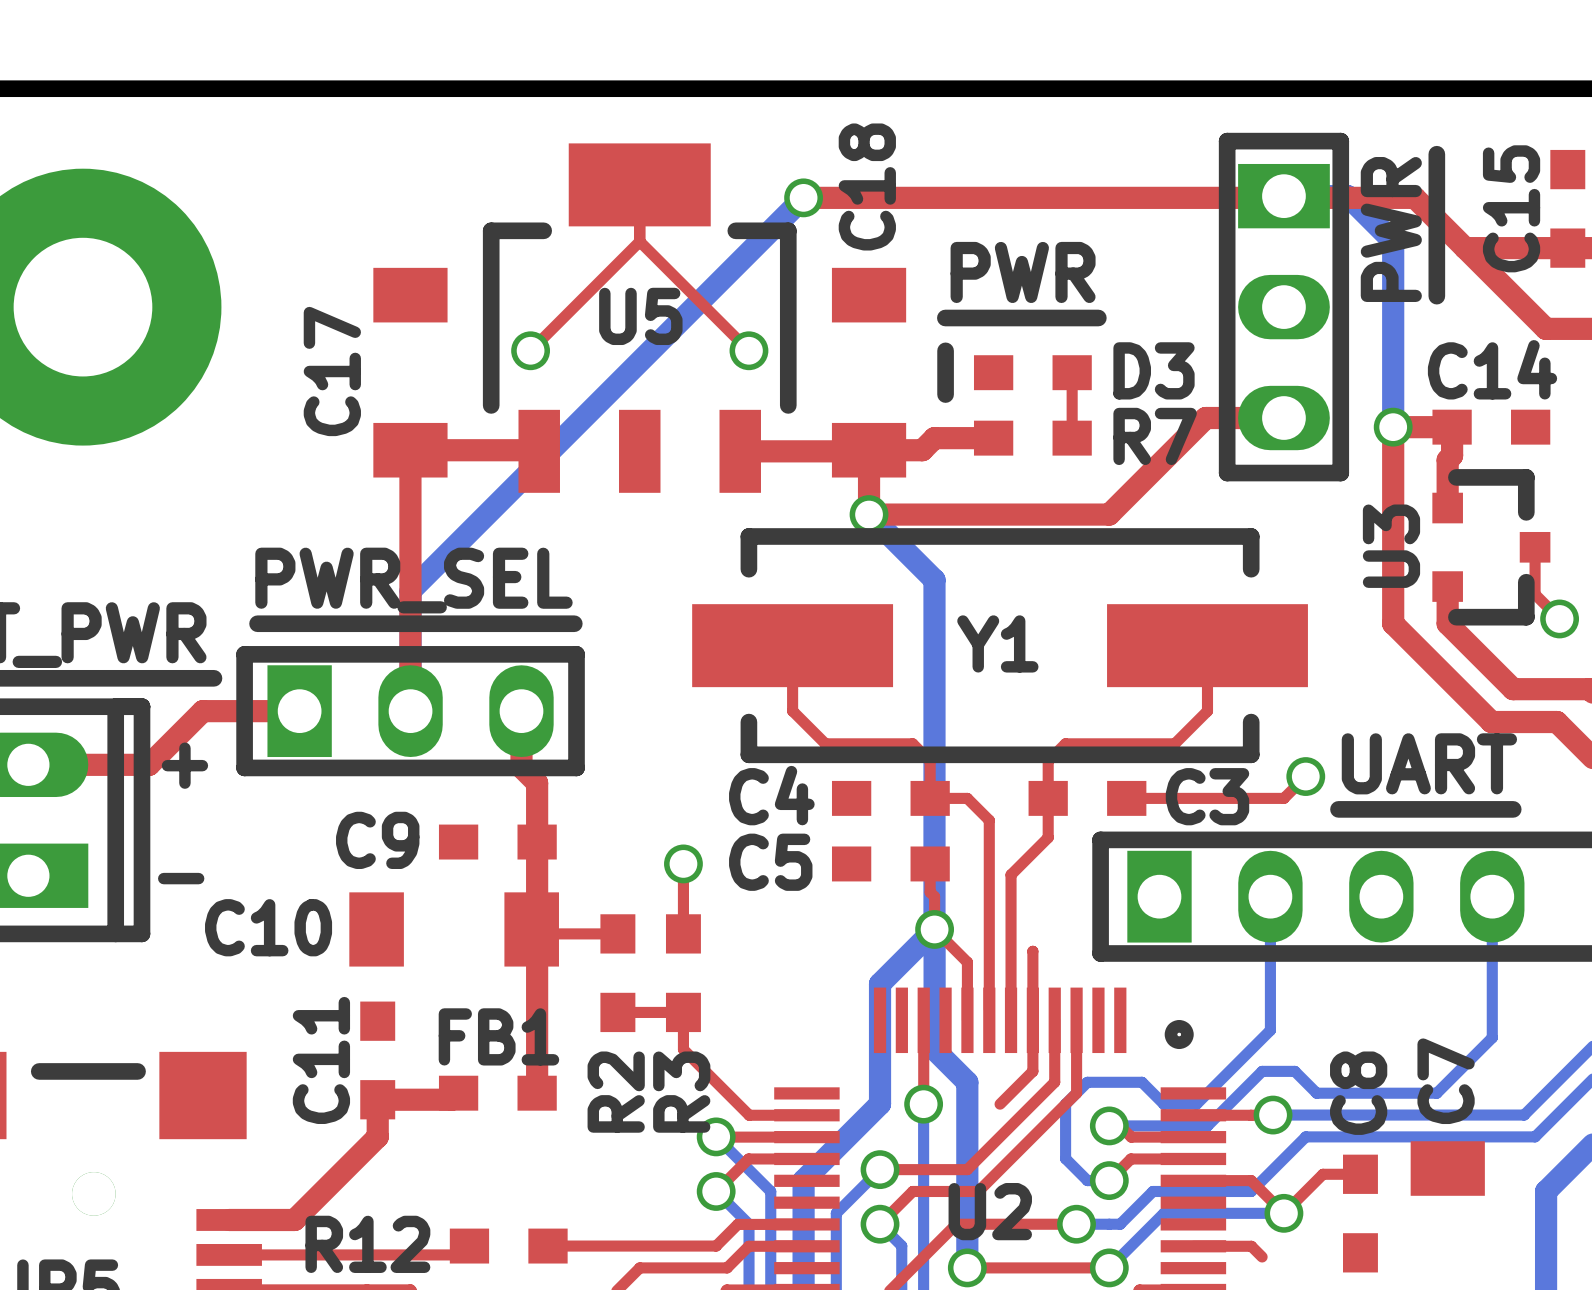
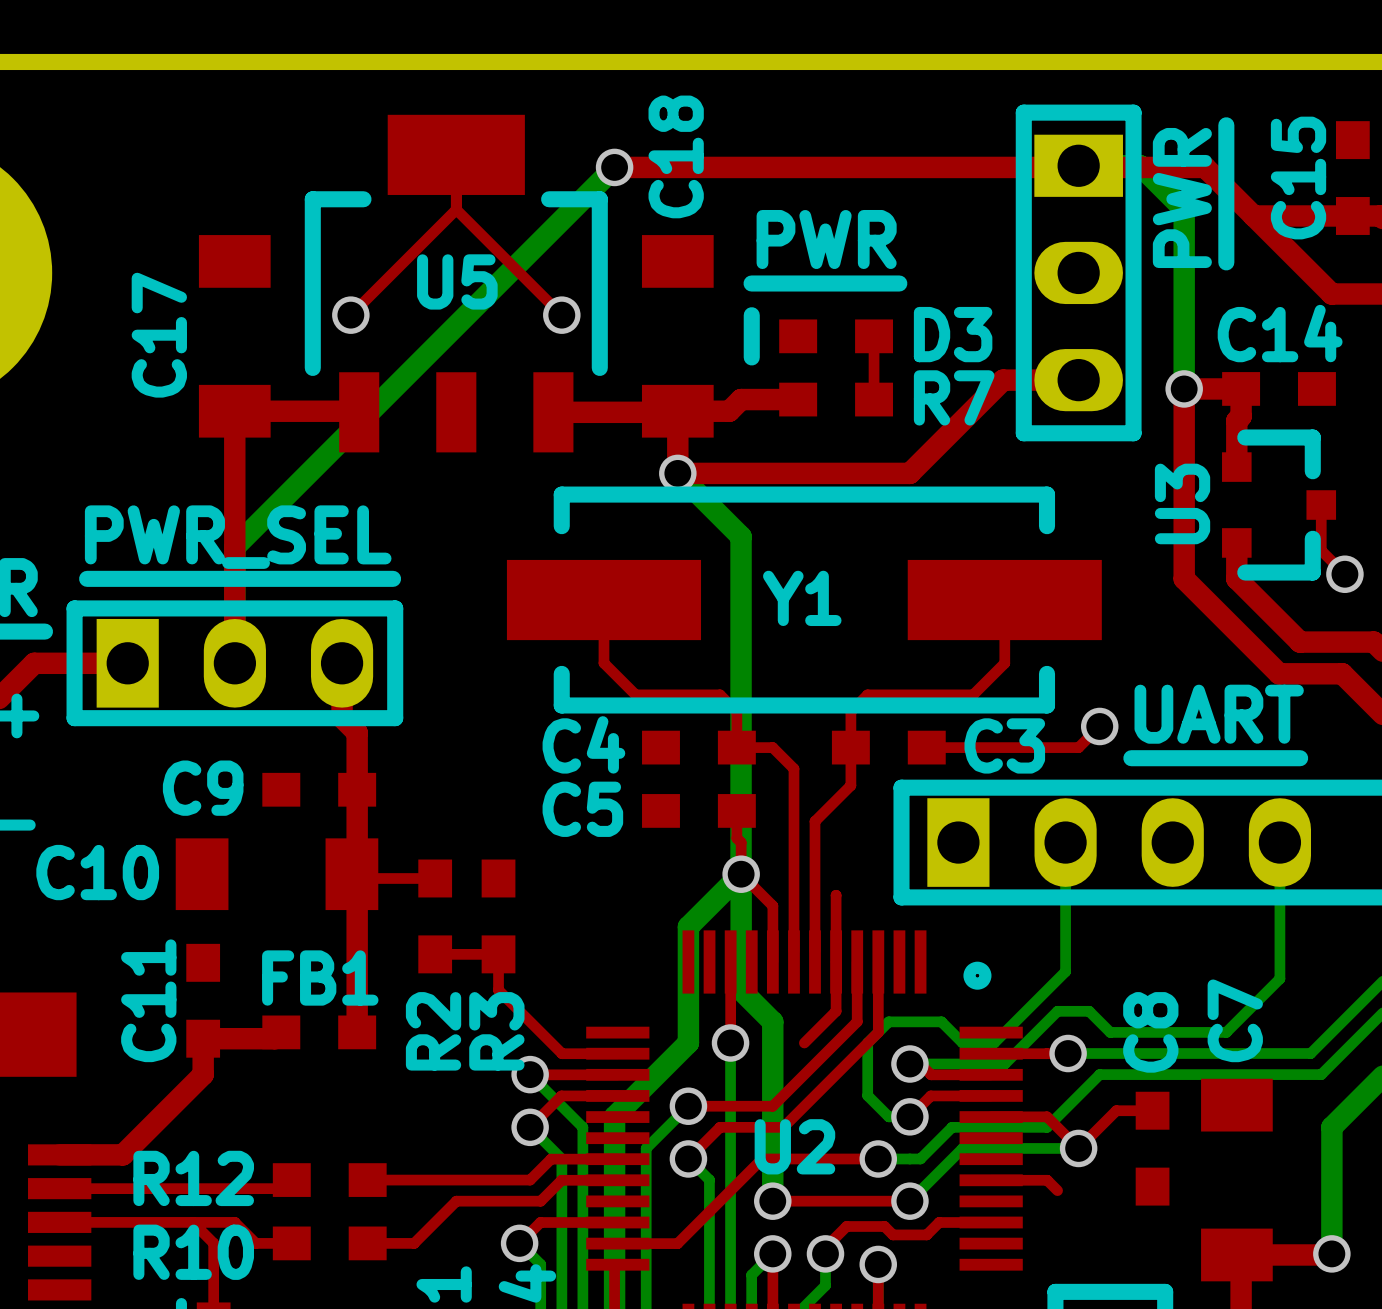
top track: (683, 863) (683, 933) -> none
via: (683, 863) -> none

